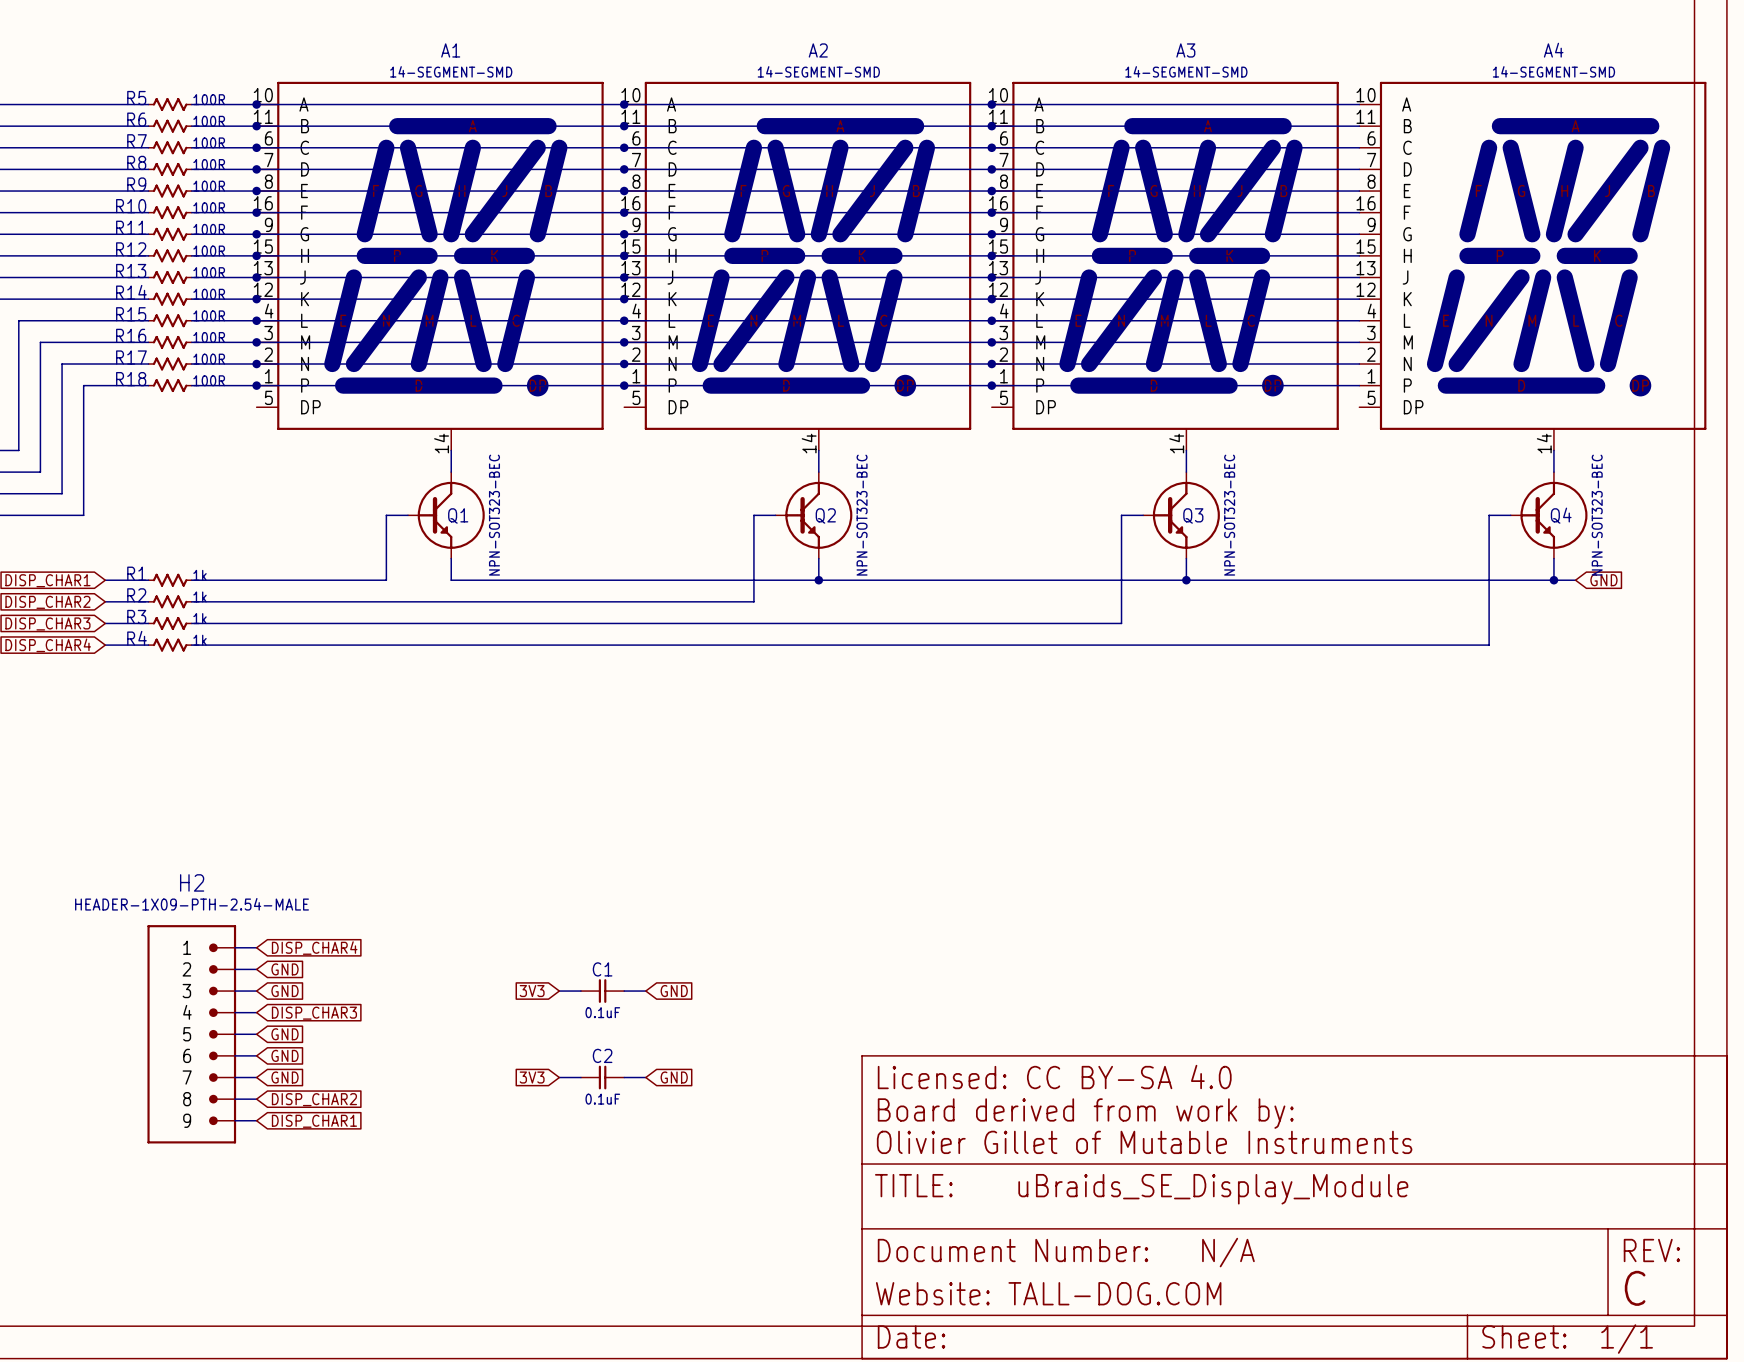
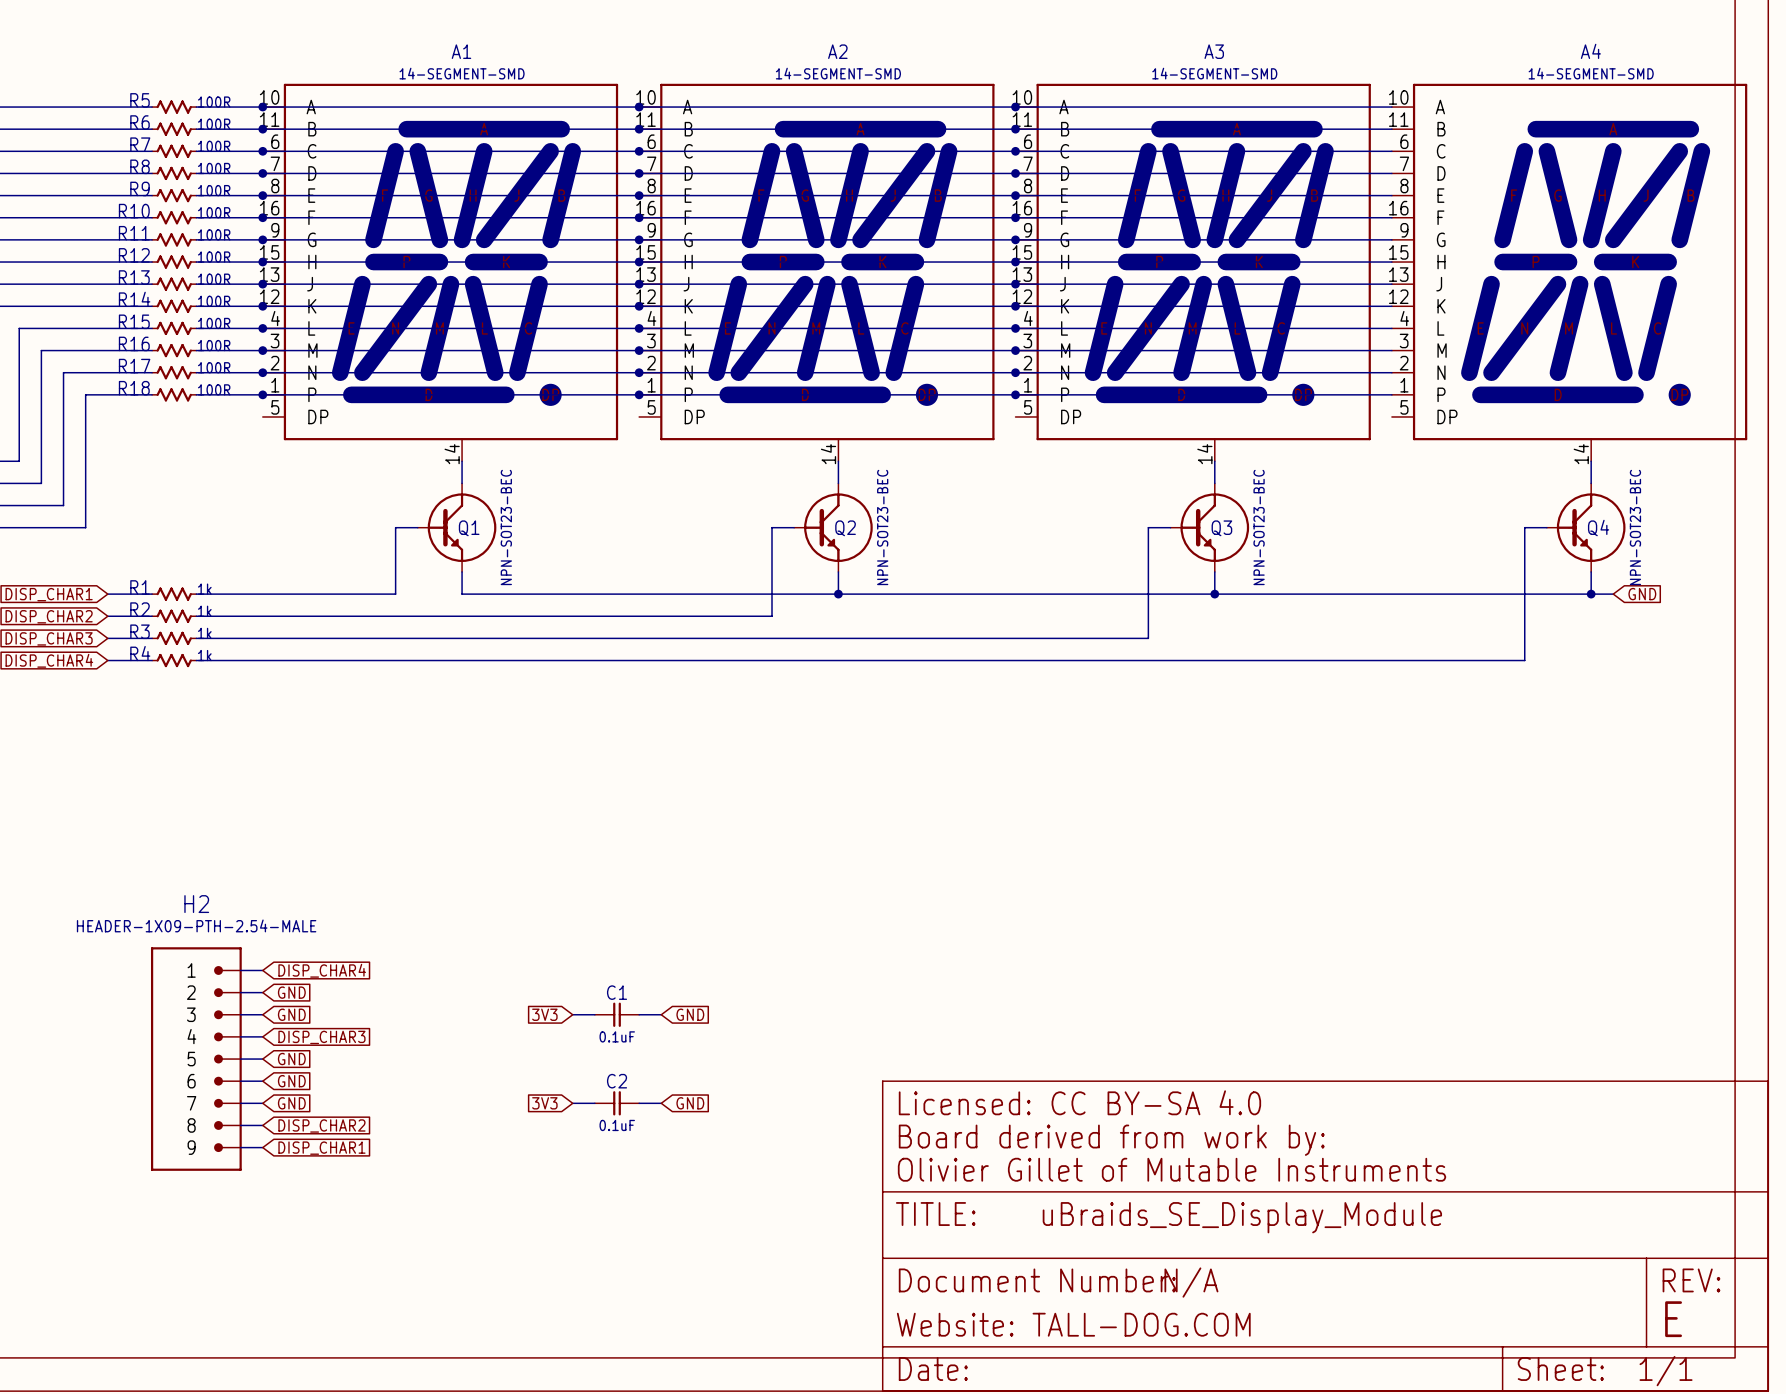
Q1 value: NPN-SOT323-BEC (494, 515) -> NPN-SOT23-BEC (506, 527)
Q2 value: NPN-SOT323-BEC (862, 515) -> NPN-SOT23-BEC (882, 527)
Q3 value: NPN-SOT323-BEC (1229, 515) -> NPN-SOT23-BEC (1259, 527)
Q4 value: NPN-SOT323-BEC (1597, 515) -> NPN-SOT23-BEC (1635, 527)
text position: N/A (1228, 1252) -> N/A (1191, 1282)
text: C (1635, 1288) -> E (1673, 1319)

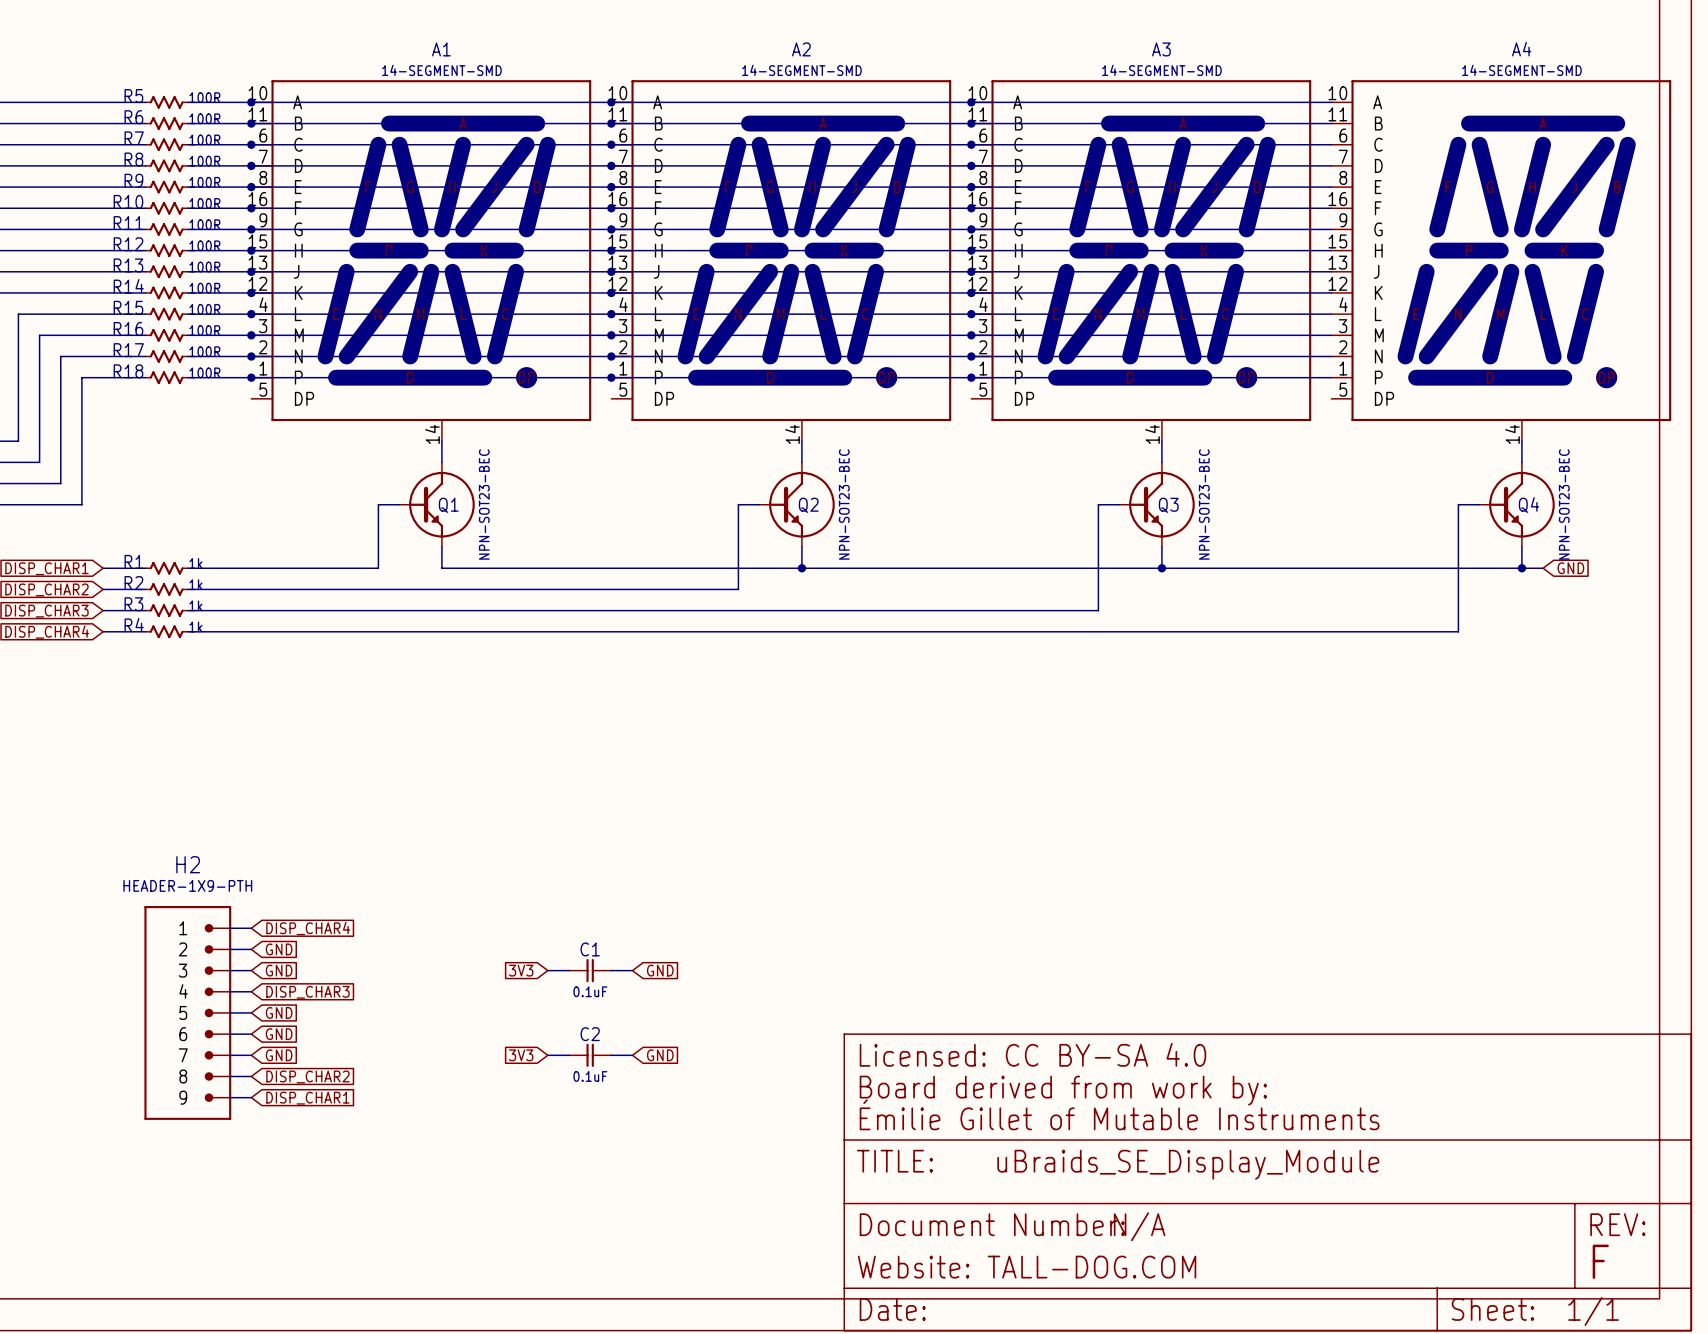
H2 value: HEADER-1X09-PTH-2.54-MALE (196, 925) -> HEADER-1X9-PTH (187, 885)
text: Olivier Gillet of Mutable Instruments (1171, 1169) -> Émilie Gillet of Mutable Instruments (1119, 1114)
text: E (1673, 1319) -> F (1600, 1261)

